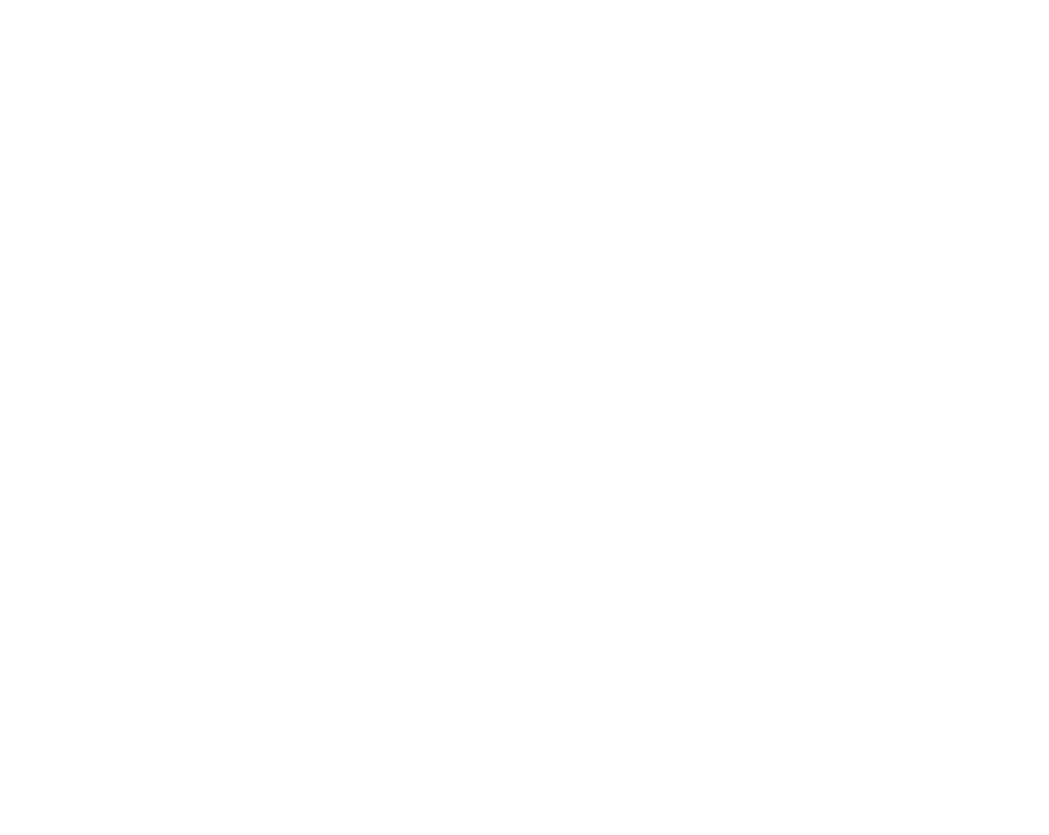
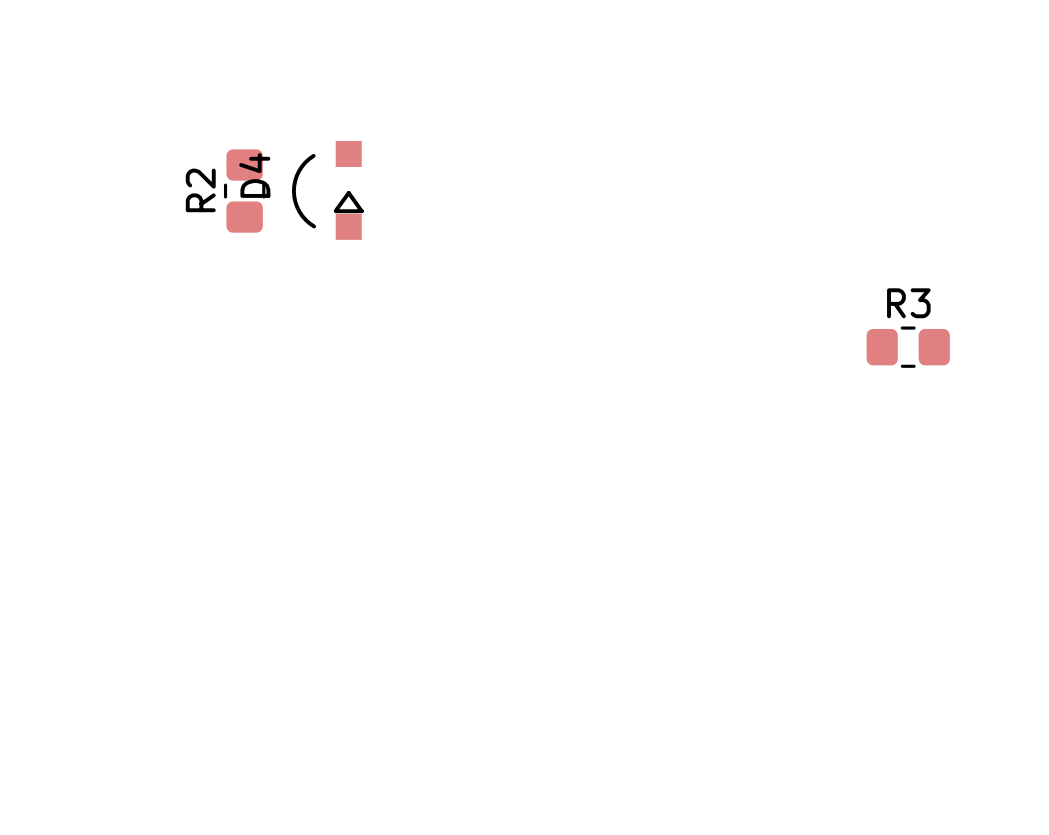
D4: none -> (327, 190)
R2: none -> (244, 191)
R3: none -> (908, 347)

